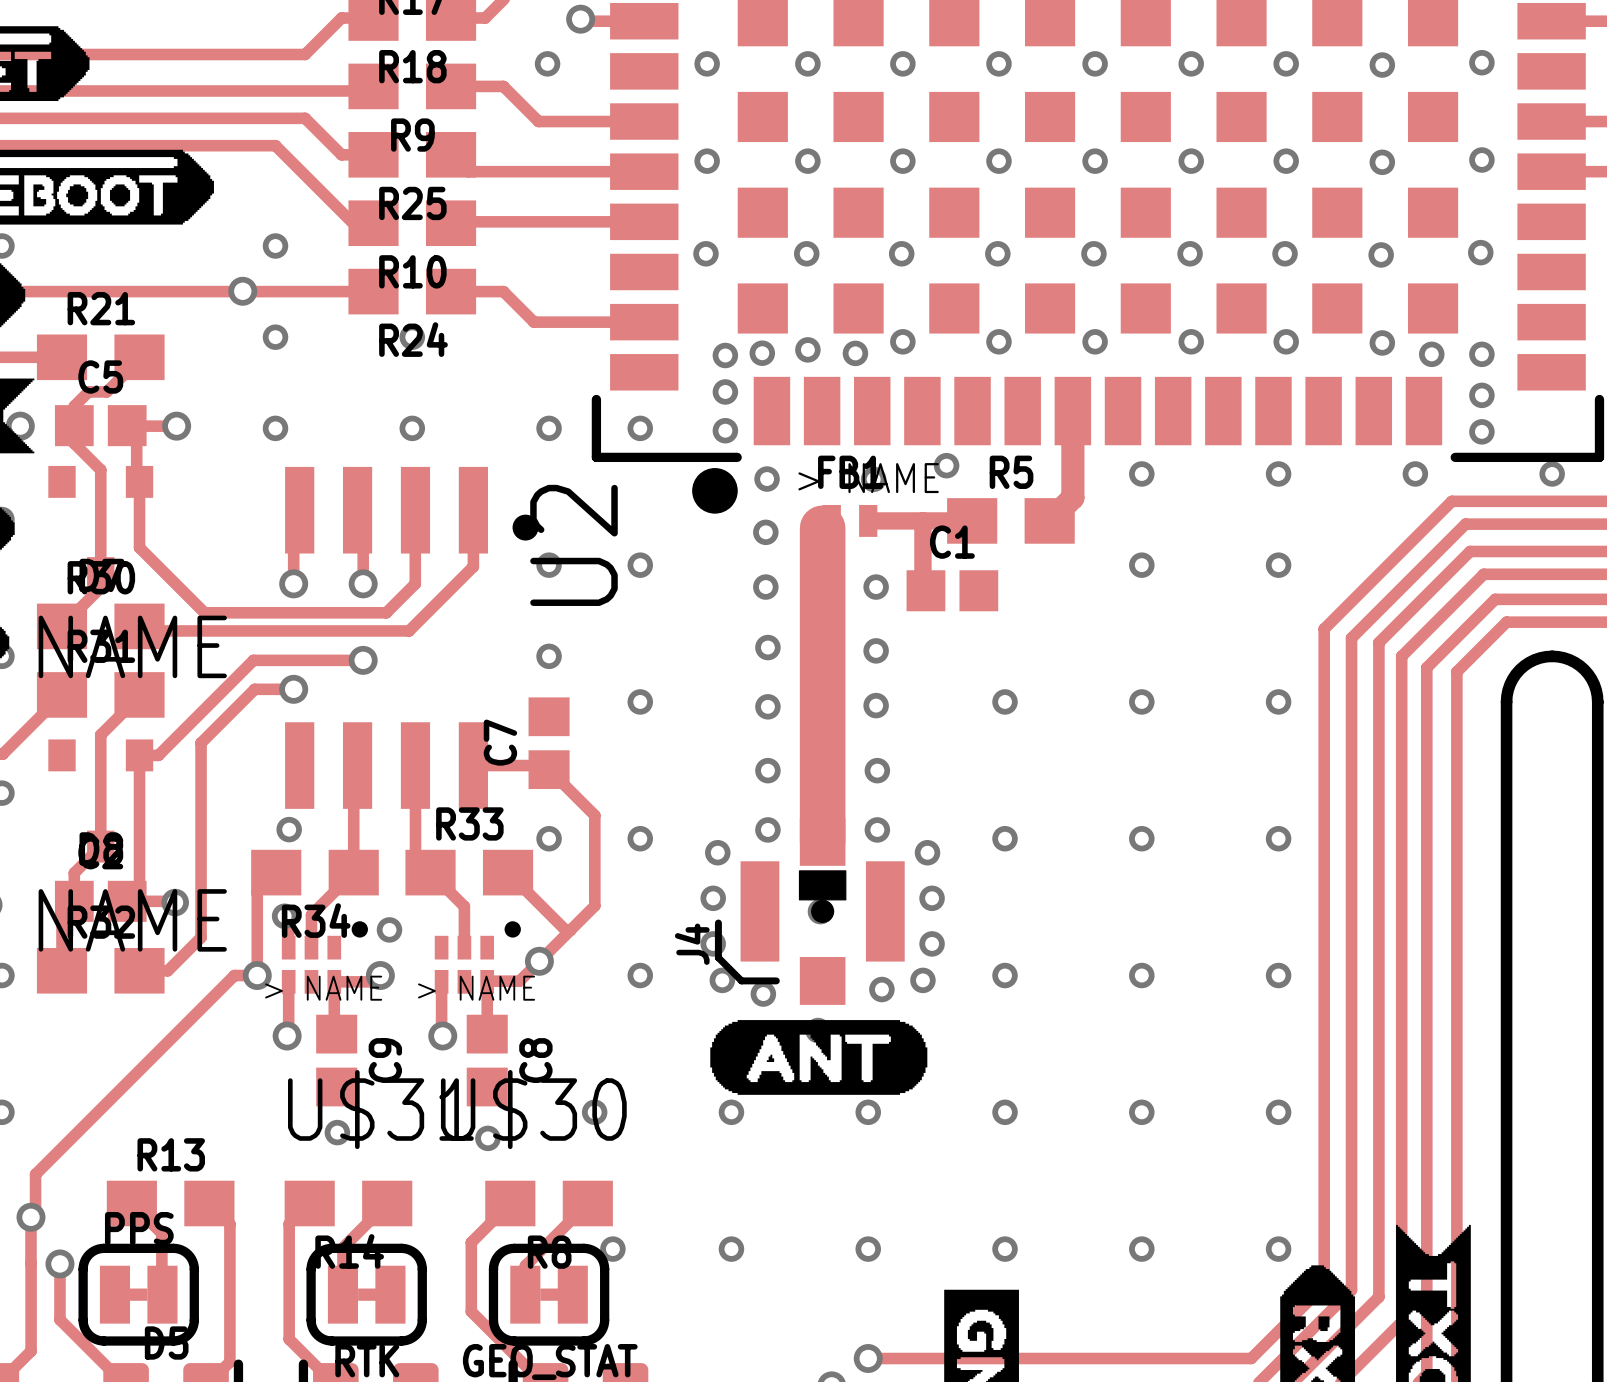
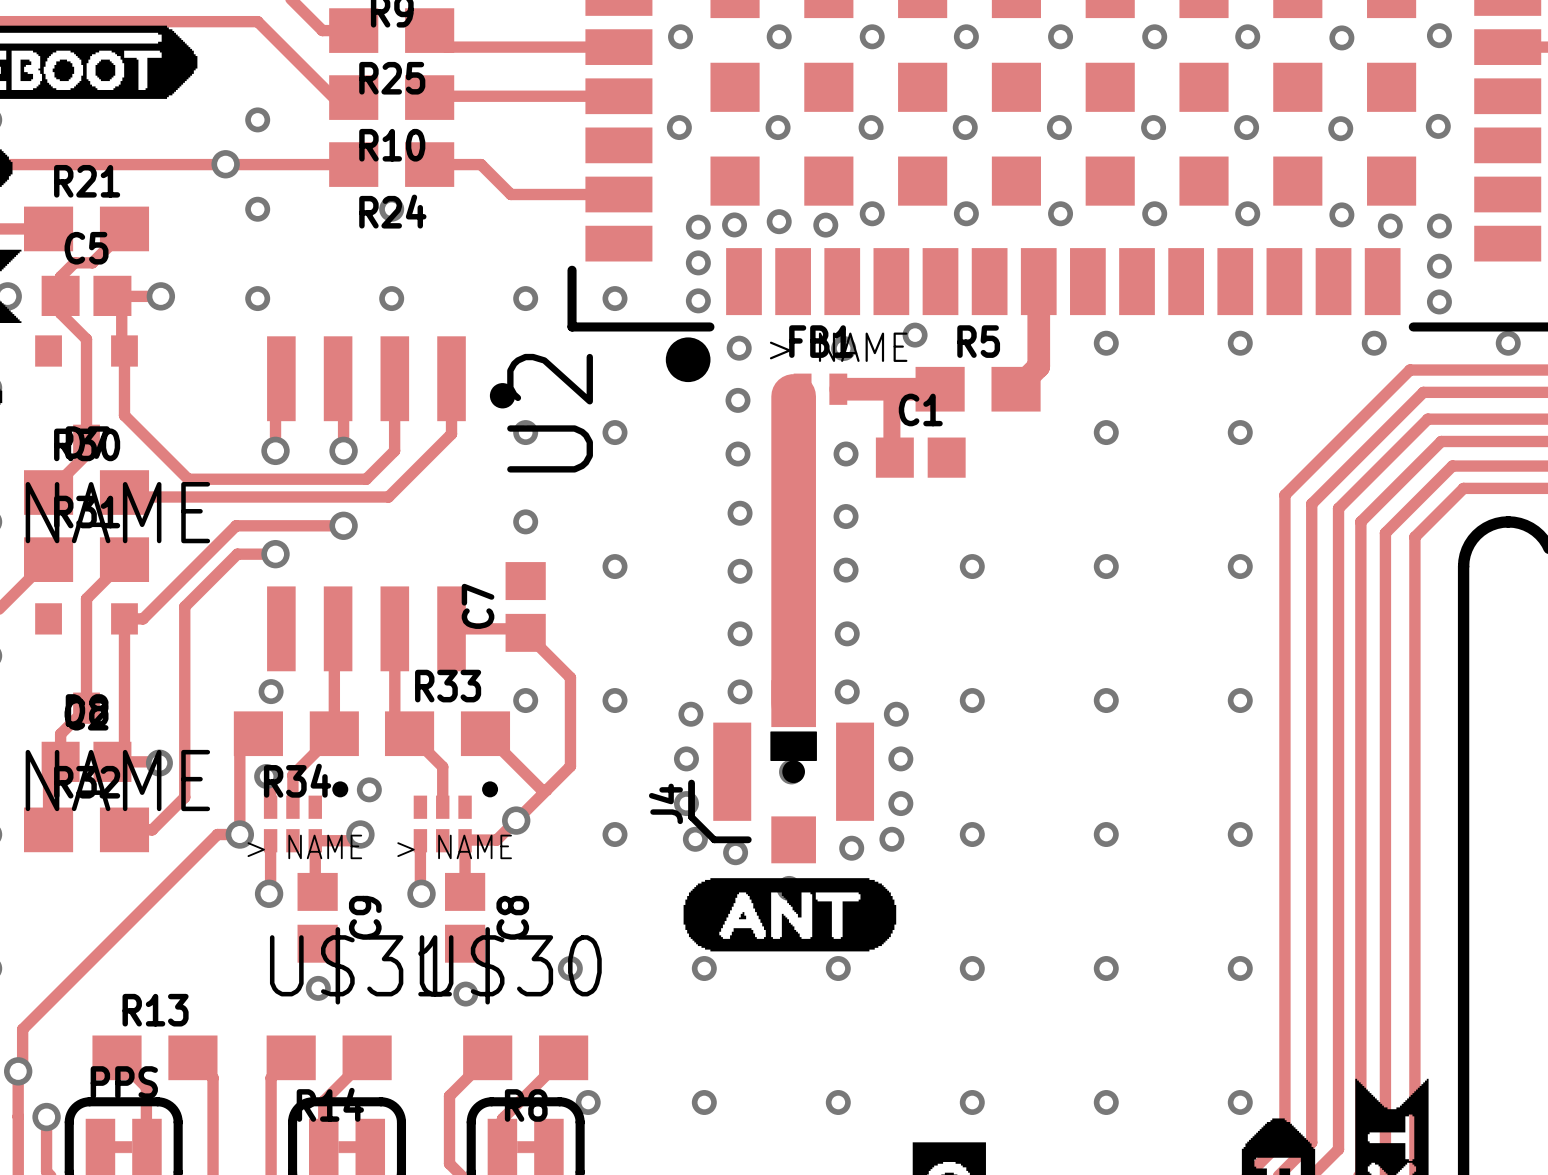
track width: thin (870, 520) (972, 520) -> thick (840, 389) (940, 389)

